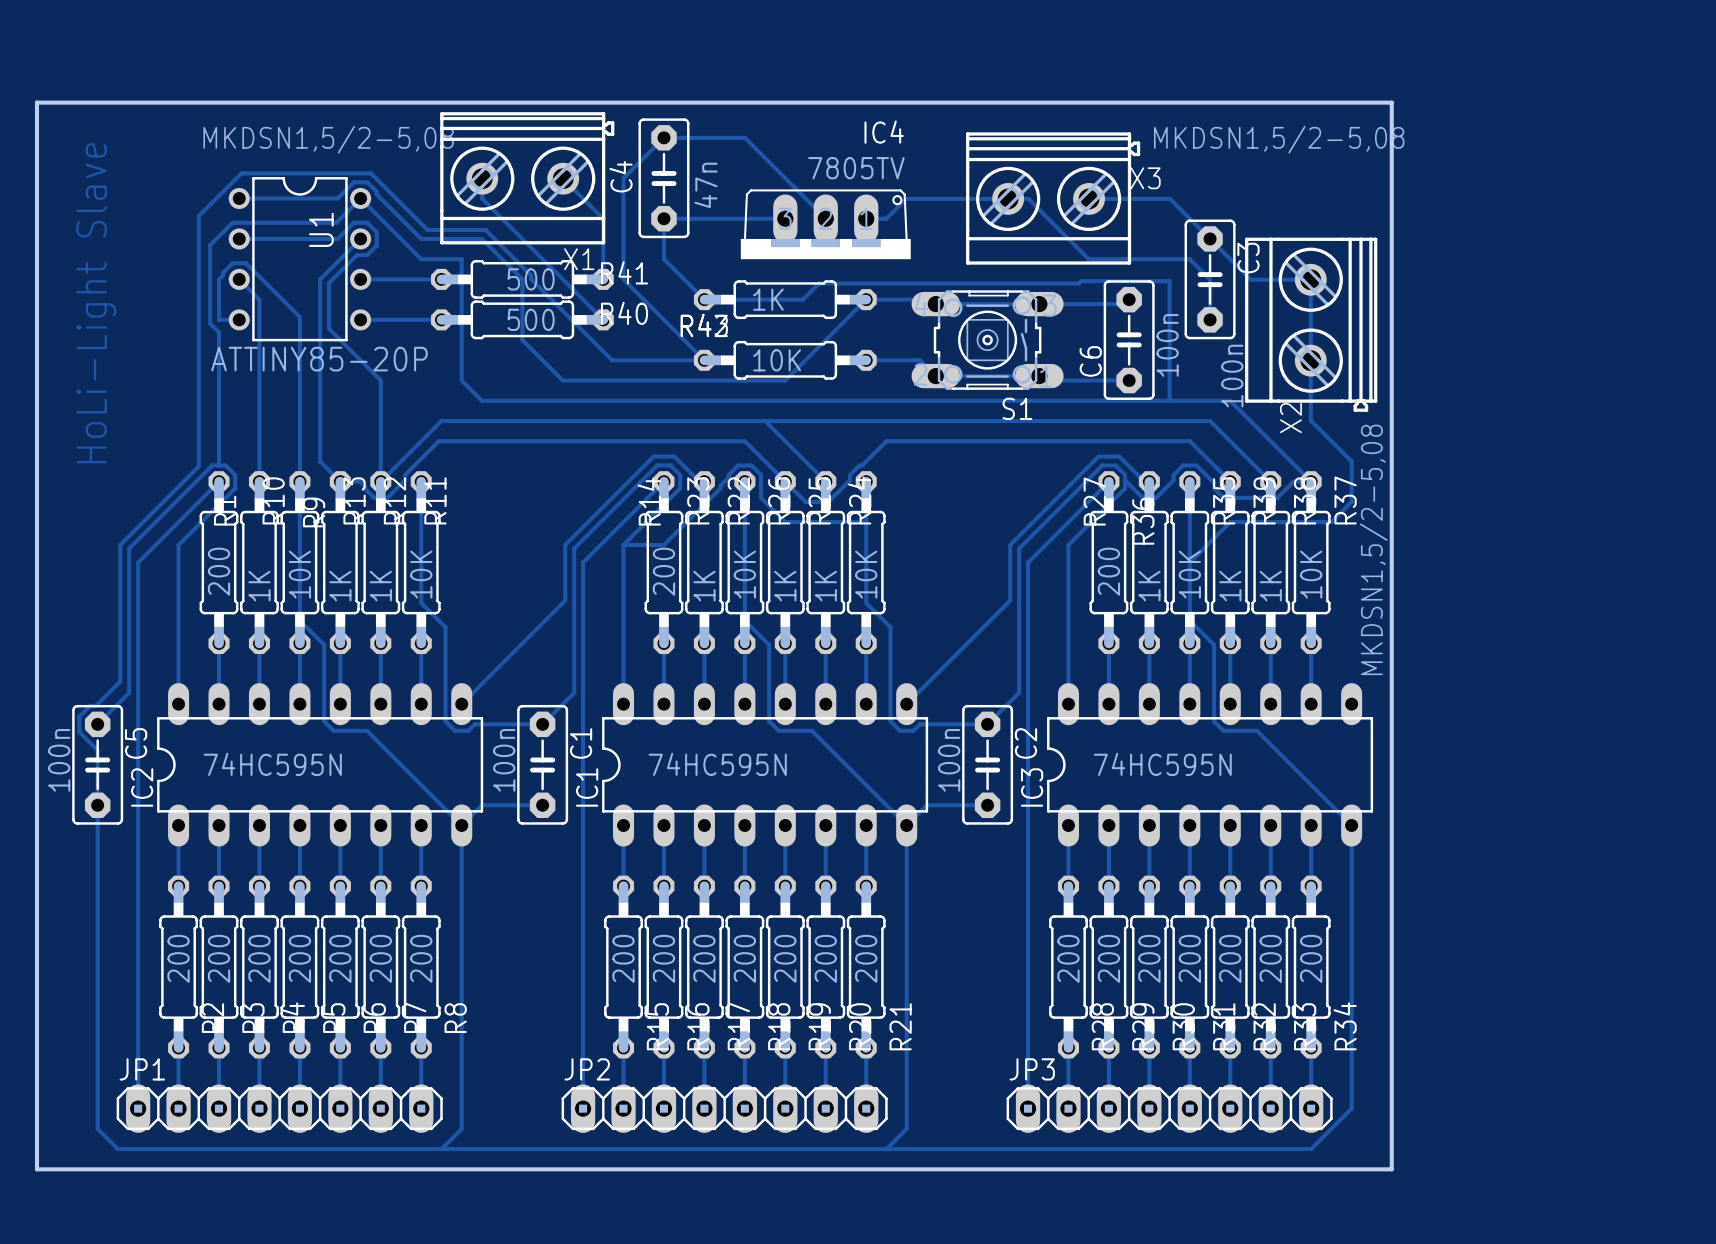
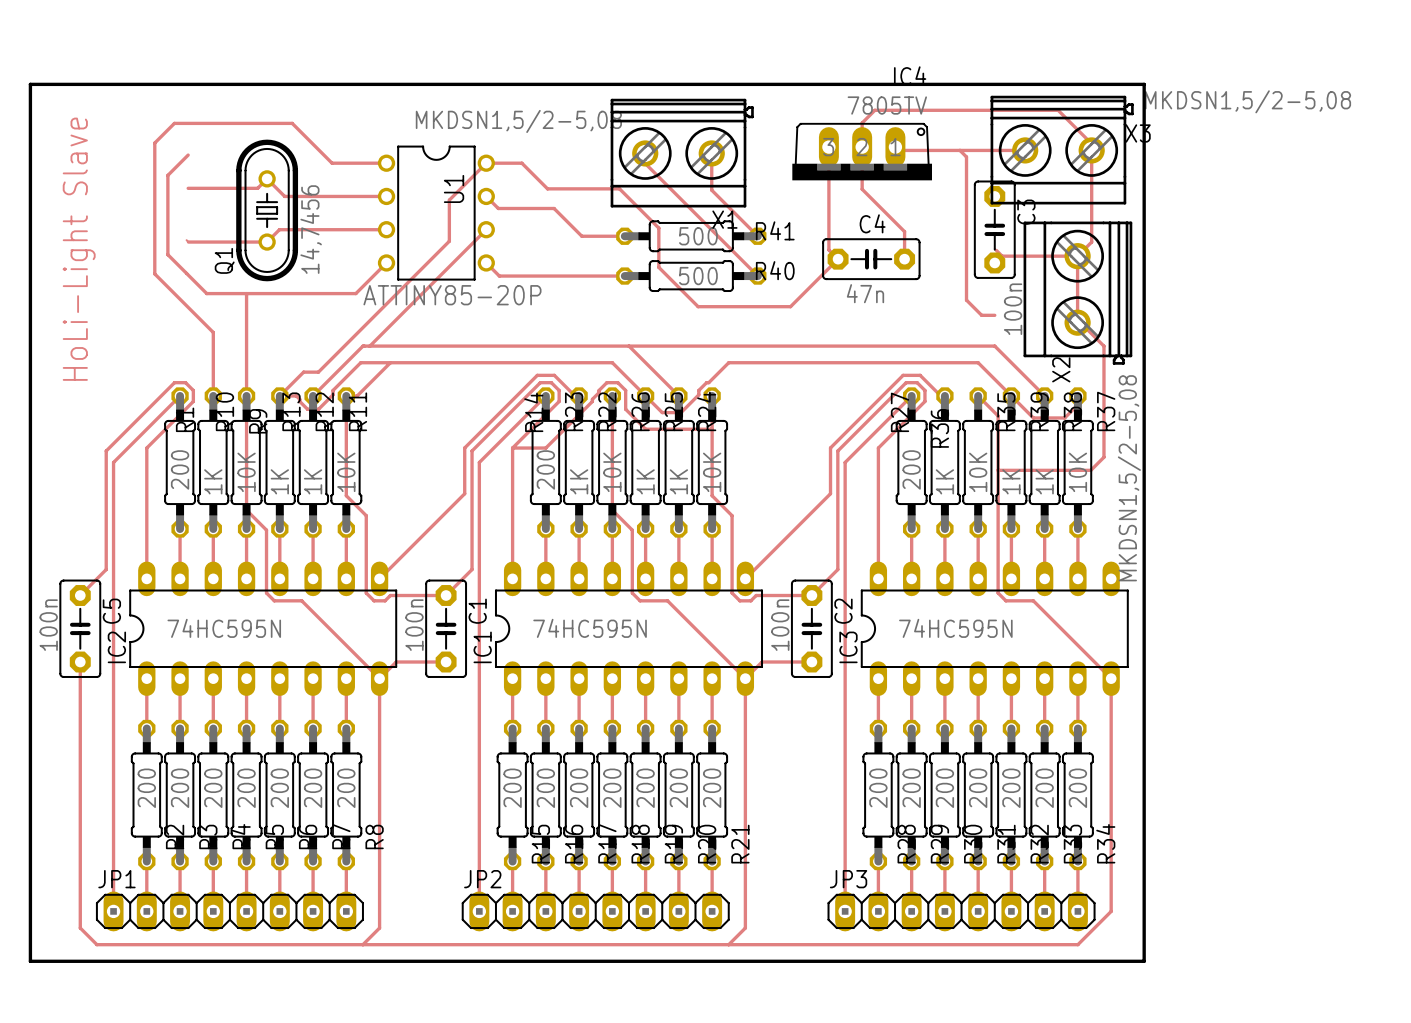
track: (482, 178) (482, 198) (603, 319) -> none
X1 position: (527, 178) -> (682, 153)
track: (563, 178) (603, 218) (603, 279) -> none
C4 rotation: 0° (663, 178) -> 90° clockwise (871, 259)
C4 position: (663, 178) -> (871, 259)
track: none -> (828, 147) (828, 250) (838, 259) (790, 306) (698, 306) (658, 267) (658, 228) (619, 188) (547, 188) (521, 163) (486, 163) (449, 200) (449, 241) (318, 372) (303, 372) (279, 395) (294, 395)
track: none -> (895, 147) (898, 150) (1025, 150)
track: none -> (959, 150) (966, 156) (966, 300) (981, 315) (994, 315)
track: none -> (645, 153) (645, 163) (757, 276)
track: none -> (711, 153) (711, 190) (757, 236)
track: none -> (188, 155) (167, 175) (167, 254) (206, 293) (355, 293) (386, 262)
track: (239, 198) (337, 198) (353, 182) (367, 182) (376, 191) (376, 194) (421, 238) -> (188, 188) (257, 188) (267, 178) (284, 196) (346, 196)
X3 position: (1053, 198) -> (1062, 150)
track: (1089, 198) (1170, 198) (1250, 279) (1310, 279) (1310, 311) -> none
track: (785, 218) (663, 218) (663, 259) (704, 299) (802, 299) (819, 283) (1078, 283) (1081, 281) (1169, 281) (1169, 400) -> none
track: (825, 218) (744, 137) (663, 137) (623, 178) (623, 279) (704, 360) (612, 360) (531, 279) (531, 275) (485, 230) (427, 230) (370, 173) (241, 173) (198, 216) (198, 466) (120, 544) (120, 681) (95, 705) (90, 705) (79, 716) (79, 731) (97, 750) (97, 805) -> none
track: (866, 218) (886, 218) (906, 198) (1028, 198) (1088, 259) (1189, 259) (1210, 279) (1210, 319) -> none
IC4 position: (825, 224) -> (862, 151)
track: (239, 238) (337, 238) (353, 222) (367, 222) (376, 232) (376, 245) (367, 255) (357, 255) (329, 283) (329, 328) (380, 380) (380, 481) -> none
track: (360, 238) (320, 279) (320, 461) (340, 481) -> none
track: (470, 238) (481, 238) (522, 279) (522, 340) (562, 380) (785, 380) (866, 299) (931, 299) (935, 304) (1124, 304) (1129, 299) -> none
track: none -> (486, 196) (498, 208) (554, 208) (581, 236) (624, 236)
Q1: none -> 14,7456 (267, 210)
U1 position: (299, 259) -> (436, 213)
track: (239, 279) (259, 299) (259, 404) -> (386, 163) (332, 163) (292, 123) (174, 123) (154, 143) (154, 273) (213, 332)
track: none -> (296, 229) (279, 229) (267, 242) (188, 242) (186, 240)
track: none -> (362, 229) (386, 229)
R41 position: (522, 279) -> (691, 236)
track: none -> (486, 229) (369, 346)
part: 1K (785, 299) -> none
track: none -> (994, 248) (1002, 256) (1077, 256) (1091, 242) (1091, 143) (1058, 110) (874, 110) (862, 123) (862, 189) (904, 231) (904, 259)
track: (239, 319) (219, 319) (219, 279) (232, 263) (245, 263) (299, 317) (299, 357) -> none
track: (360, 319) (441, 319) -> none
R40 position: (522, 319) -> (691, 276)
track: none -> (486, 262) (499, 276) (624, 276)
X2 position: (1311, 324) -> (1077, 293)
S1: (987, 340) -> none
C6: 100n (1129, 340) -> none
part: 10K (785, 360) -> none
track: (866, 360) (920, 360) (935, 376) (1039, 376) (1043, 380) (1129, 380) -> none
track: (1310, 392) (1310, 420) (1351, 461) (1351, 501) (1331, 522) (1230, 522) (1189, 562) -> (1077, 322) (1080, 322) (1103, 346) (1103, 457) (1090, 470) (998, 470)
track: none -> (390, 362) (357, 395) (346, 395)
track: (219, 465) (219, 332) (210, 323) (210, 245) (232, 222) (336, 222) (360, 198) (421, 259) (461, 259) (461, 380) (481, 400) (1230, 400) (1311, 481) (1293, 481) (1277, 497) (1223, 497) (1214, 488) (1214, 483) (1196, 465) (1183, 465) (1173, 474) (1173, 480) (1156, 497) (1142, 497) (1125, 481) -> none
track: (1189, 481) (1189, 620) (1214, 644) -> (978, 395) (998, 415) (998, 530)
track: none -> (1011, 395) (1033, 417) (1064, 417) (1077, 404) (1077, 395)

